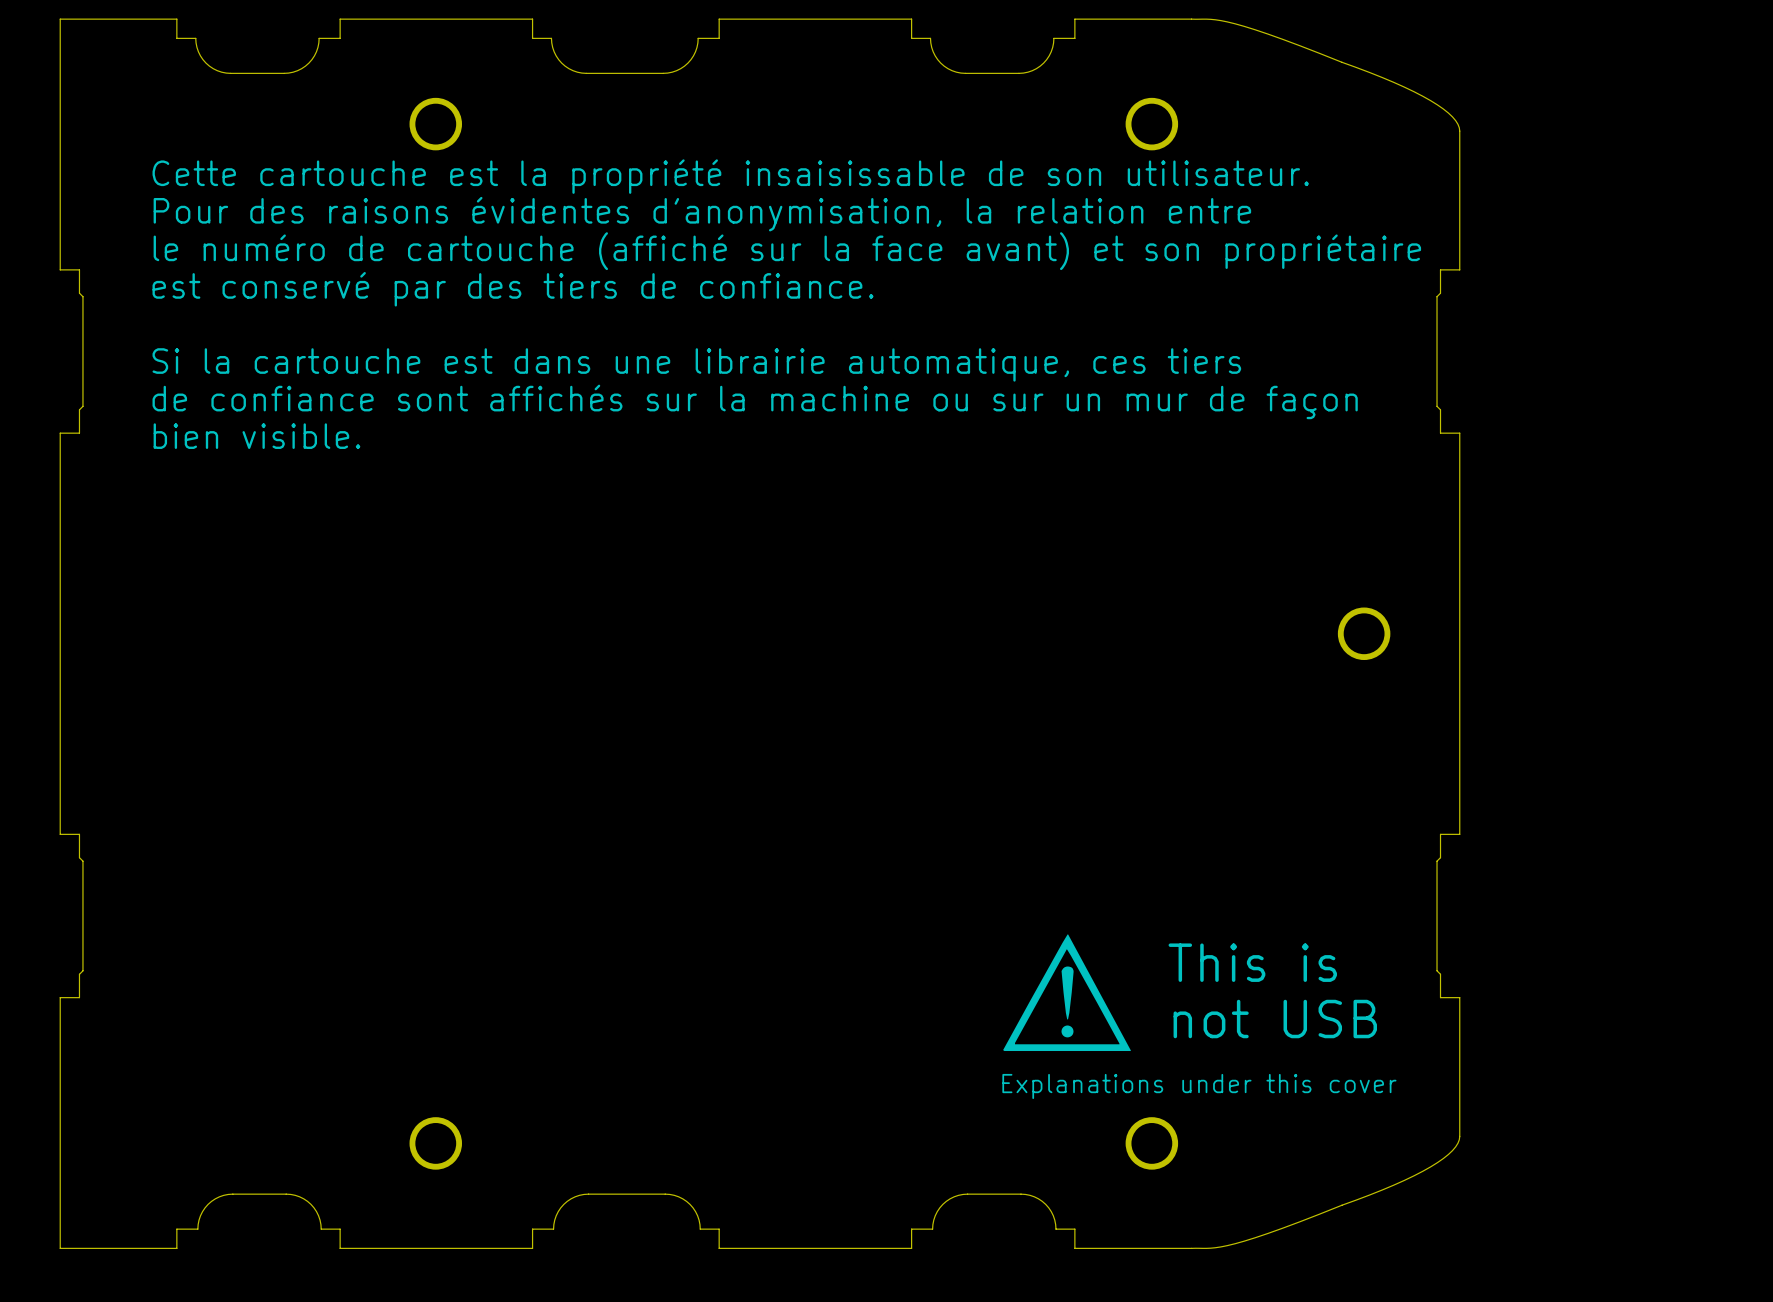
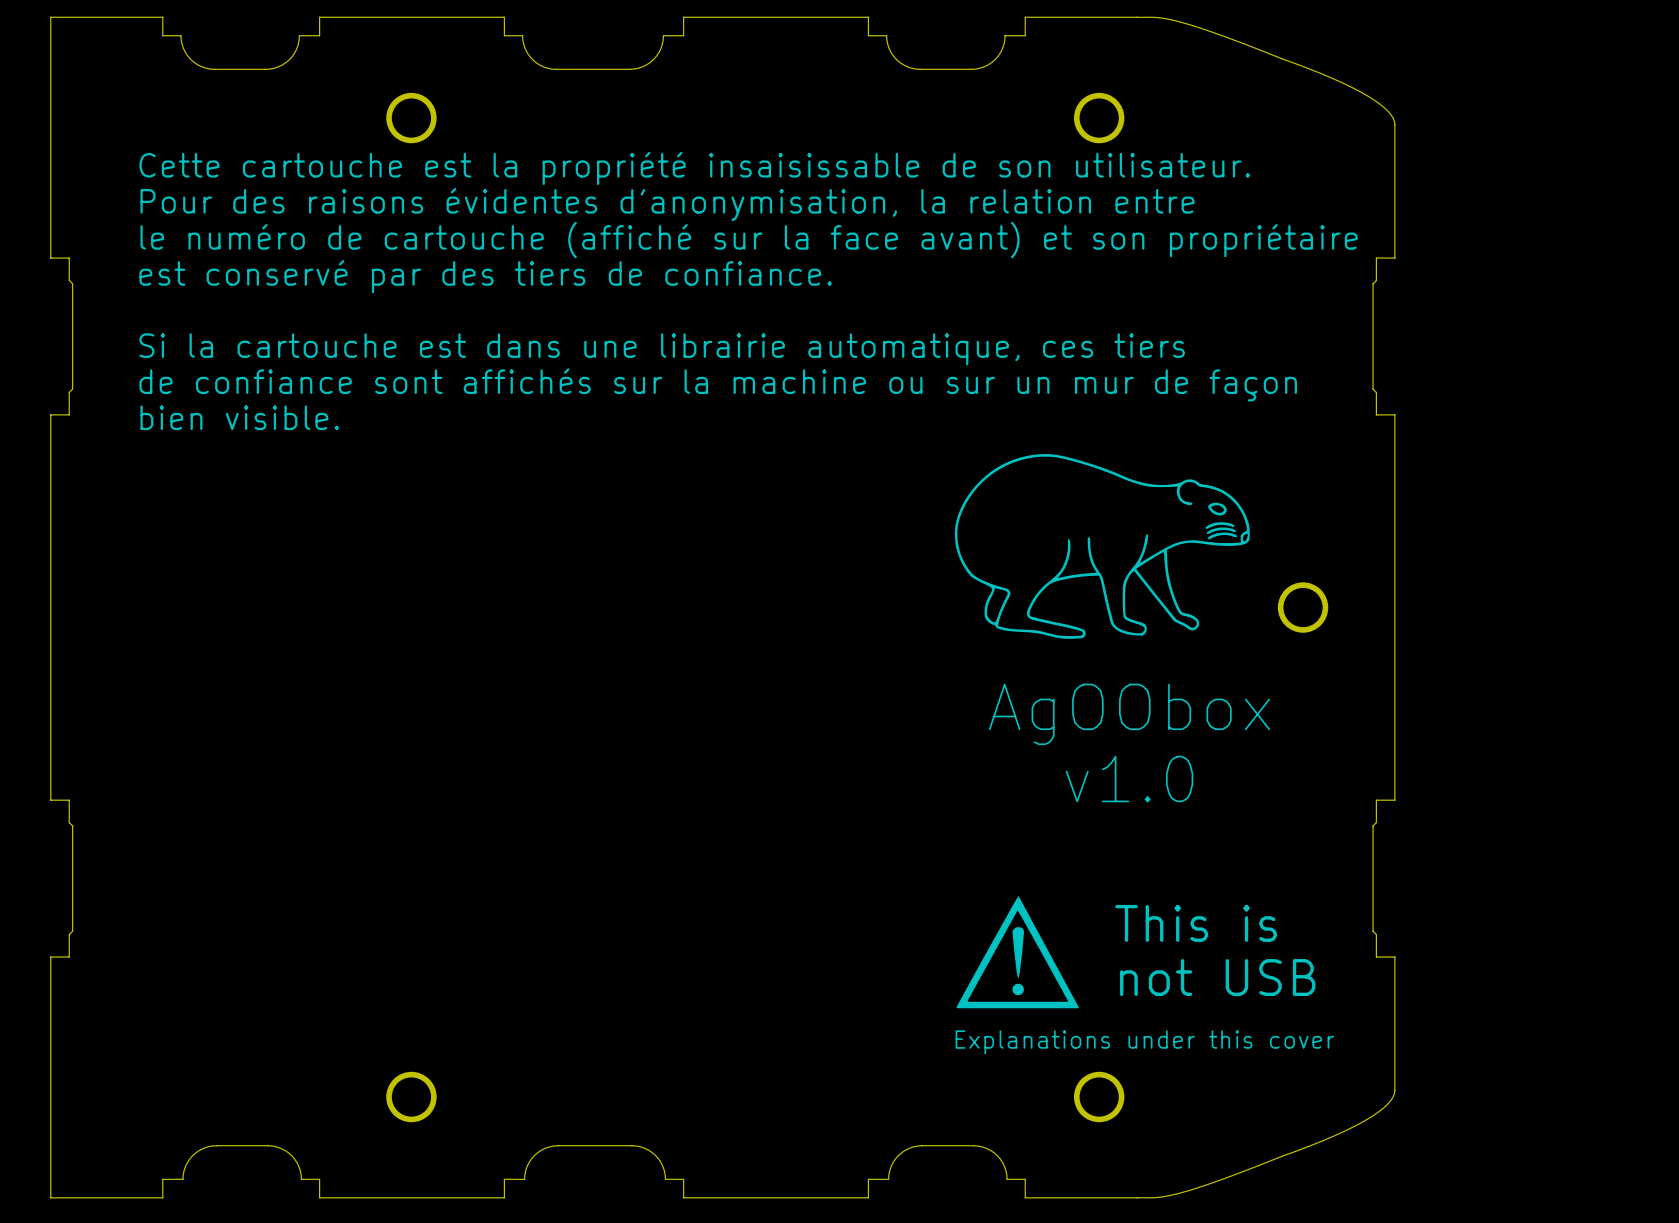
drawing: none -> [954, 454, 1250, 639]
text: none -> AgOObox (1129, 714)
text: none -> v1.0 (1129, 779)

